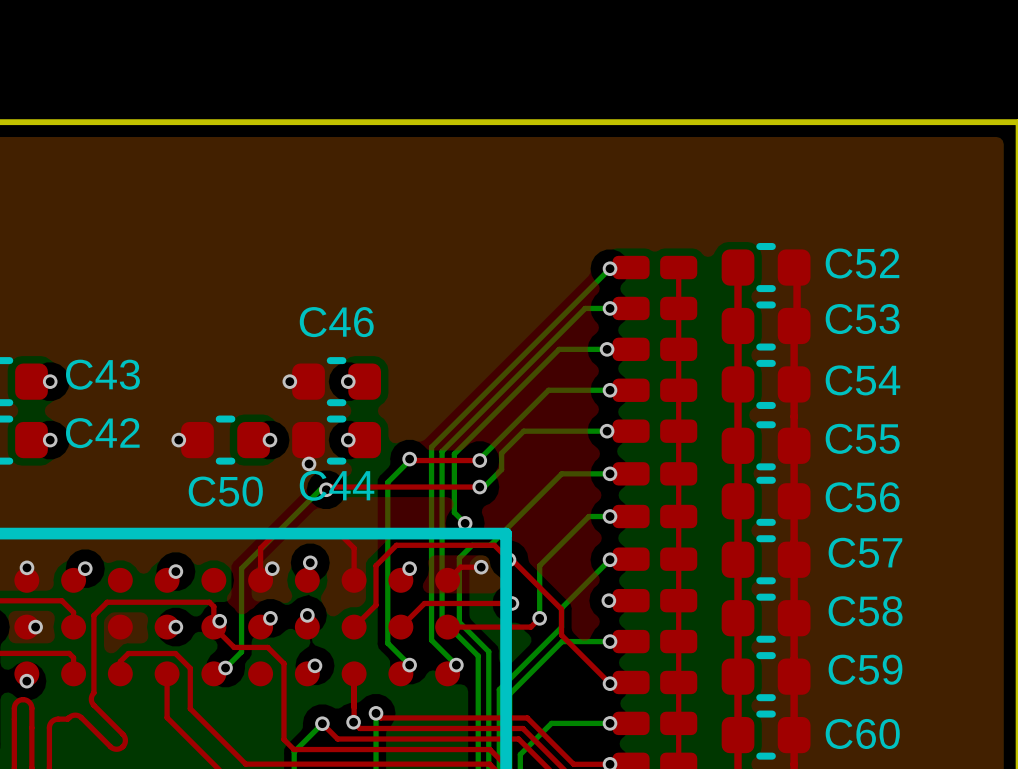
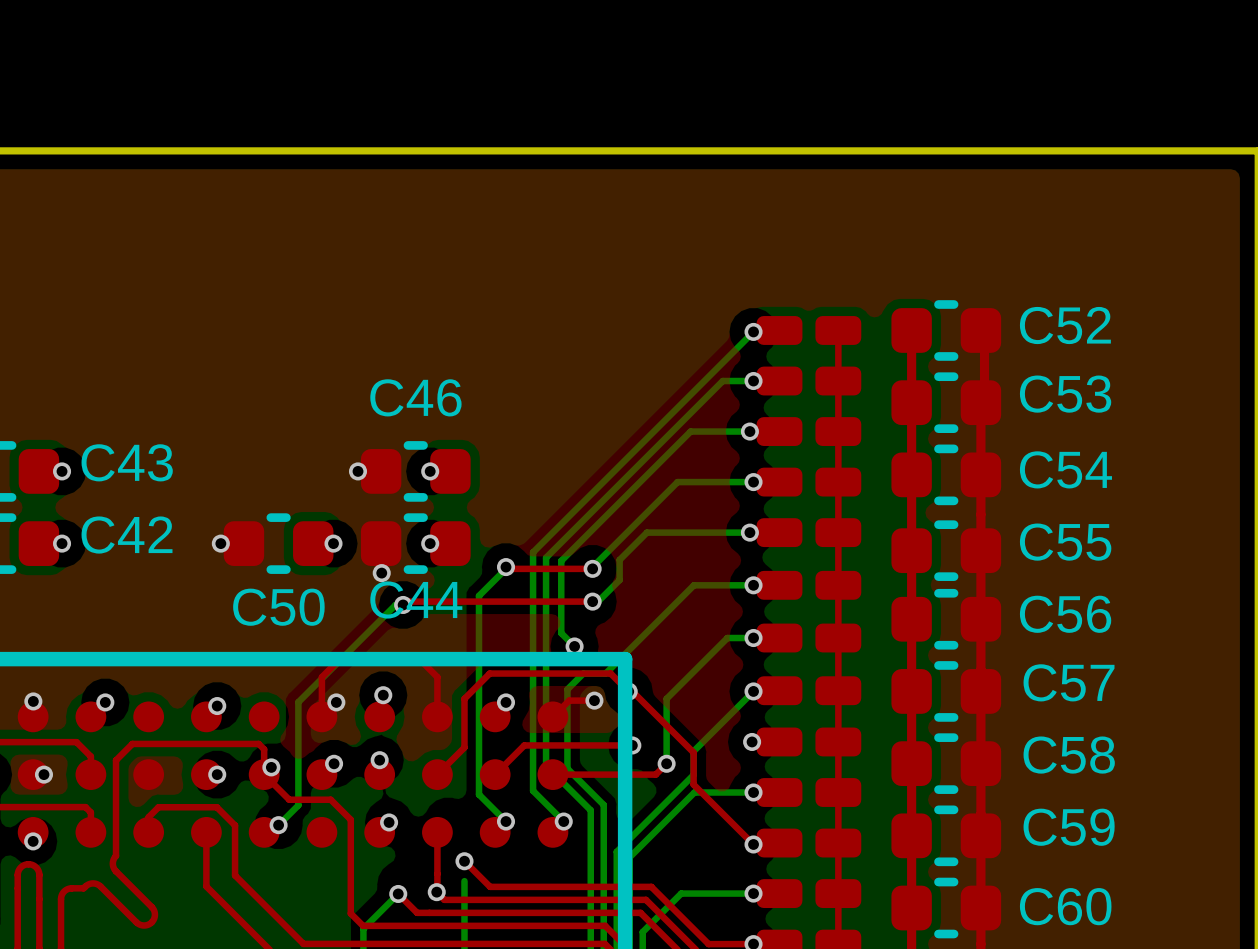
top track: (376, 713) (380, 717) (527, 717) -> (464, 861) (490, 886) (651, 886)
via position: (376, 713) -> (464, 861)

